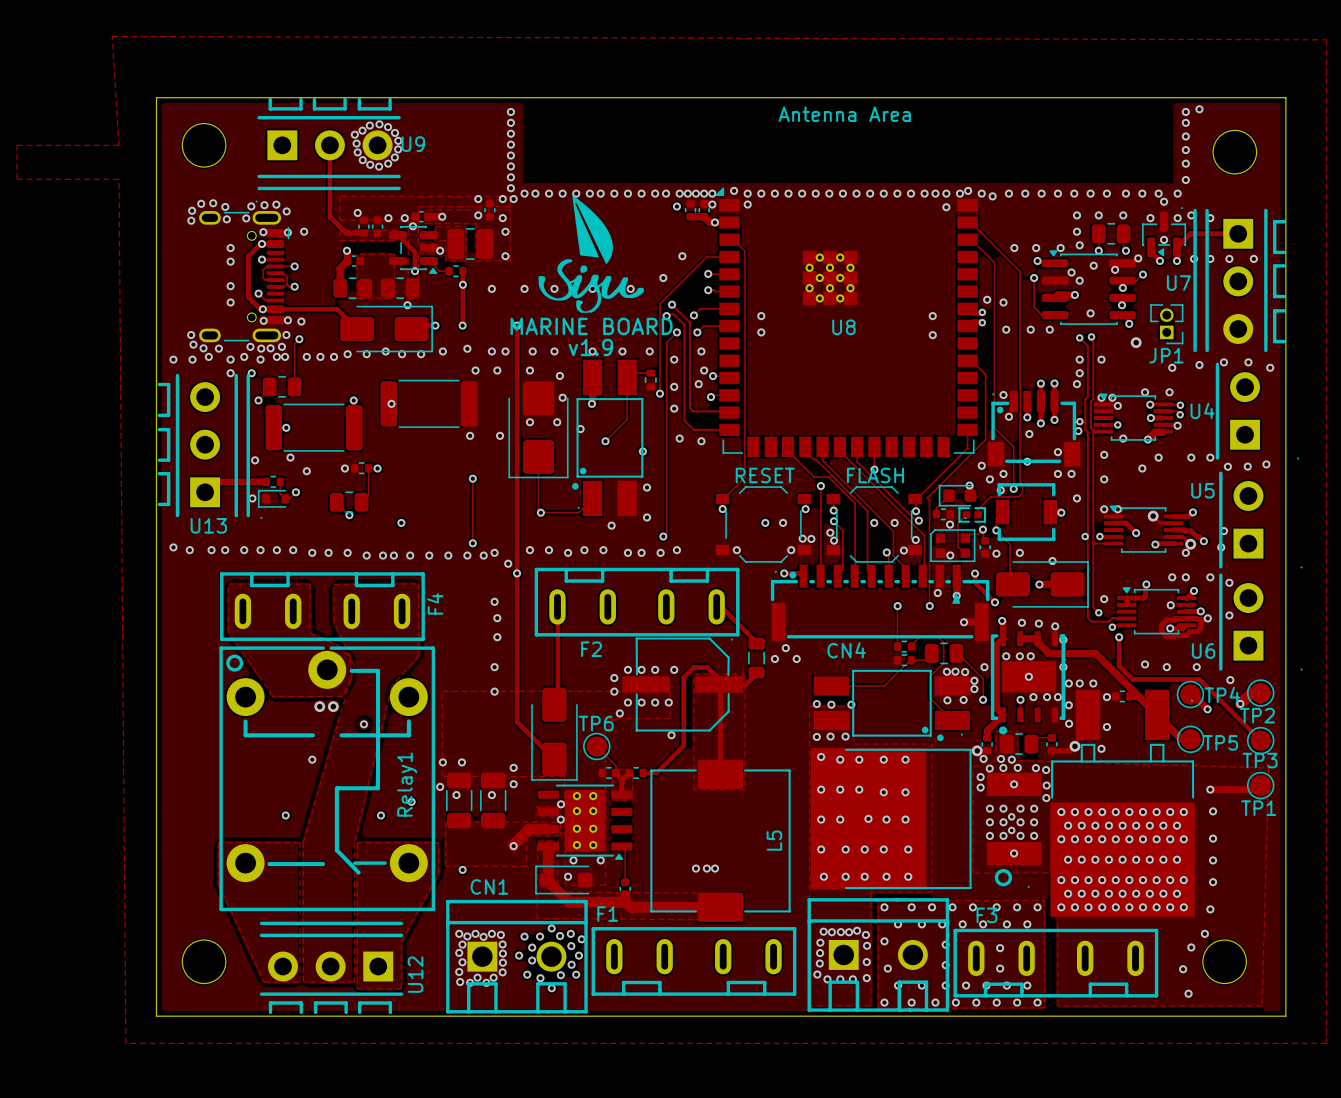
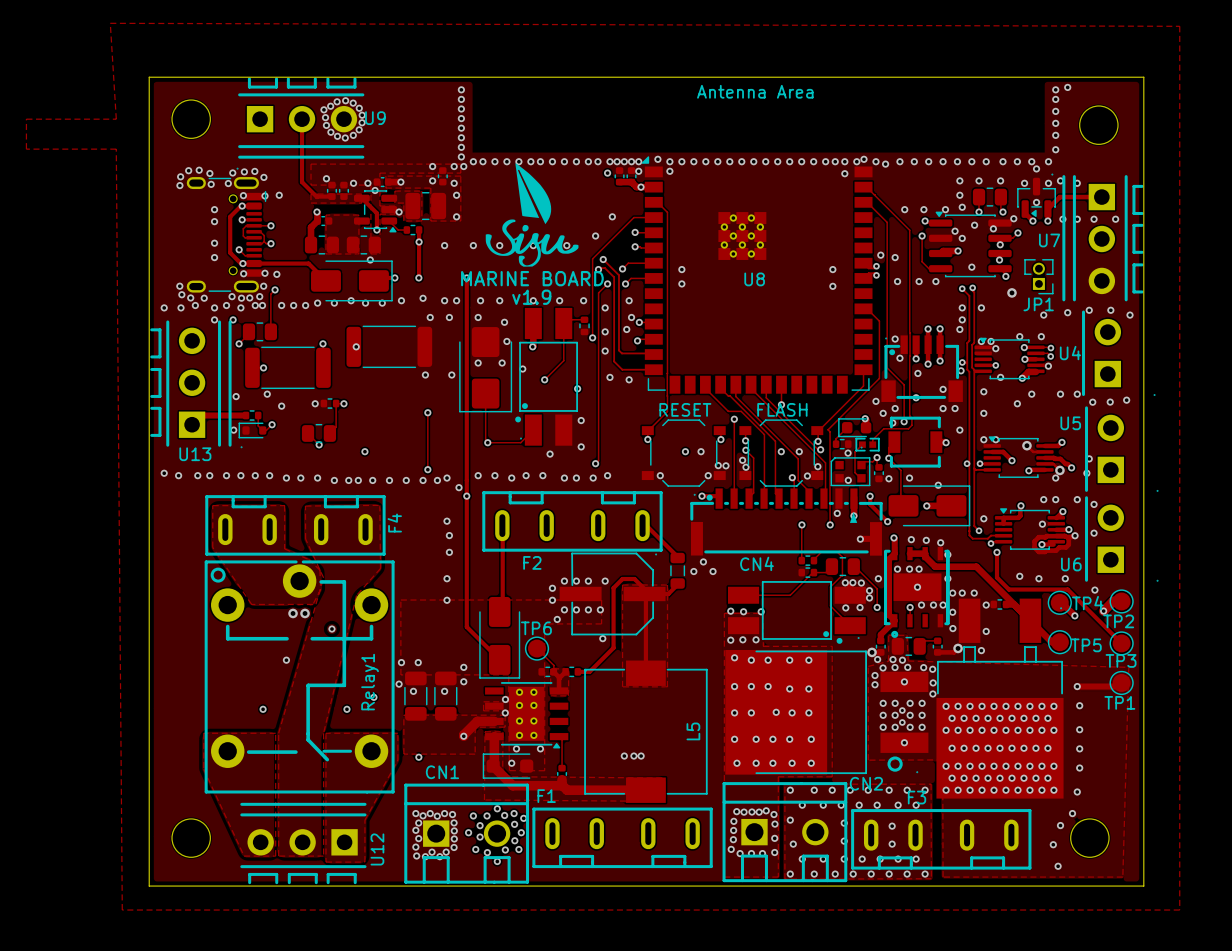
CN2 name: none -> CN2 (866, 783)
F3 name position: F3 (986, 915) -> F3 (917, 797)

